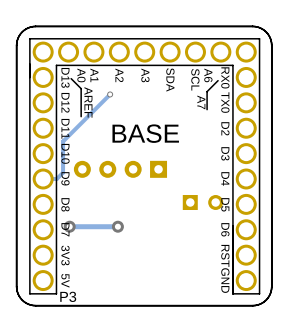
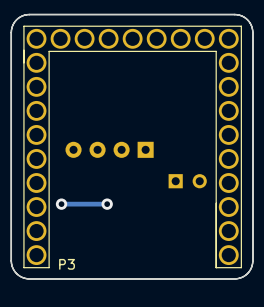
P3 footprint: [29, 38, 261, 295] -> [23, 25, 242, 269]
track: (110, 94) (63, 141) (63, 172) (56, 178) (43, 178) -> none
via: (110, 94) -> none
text: BASE (145, 133) -> none

